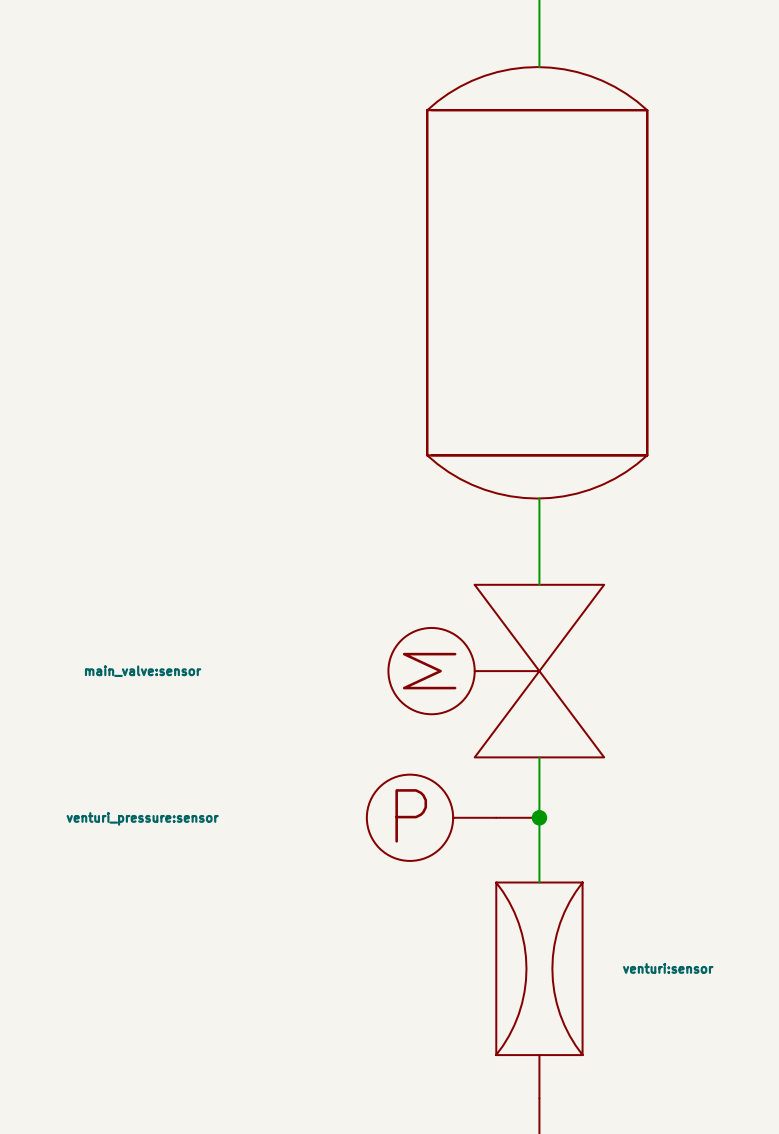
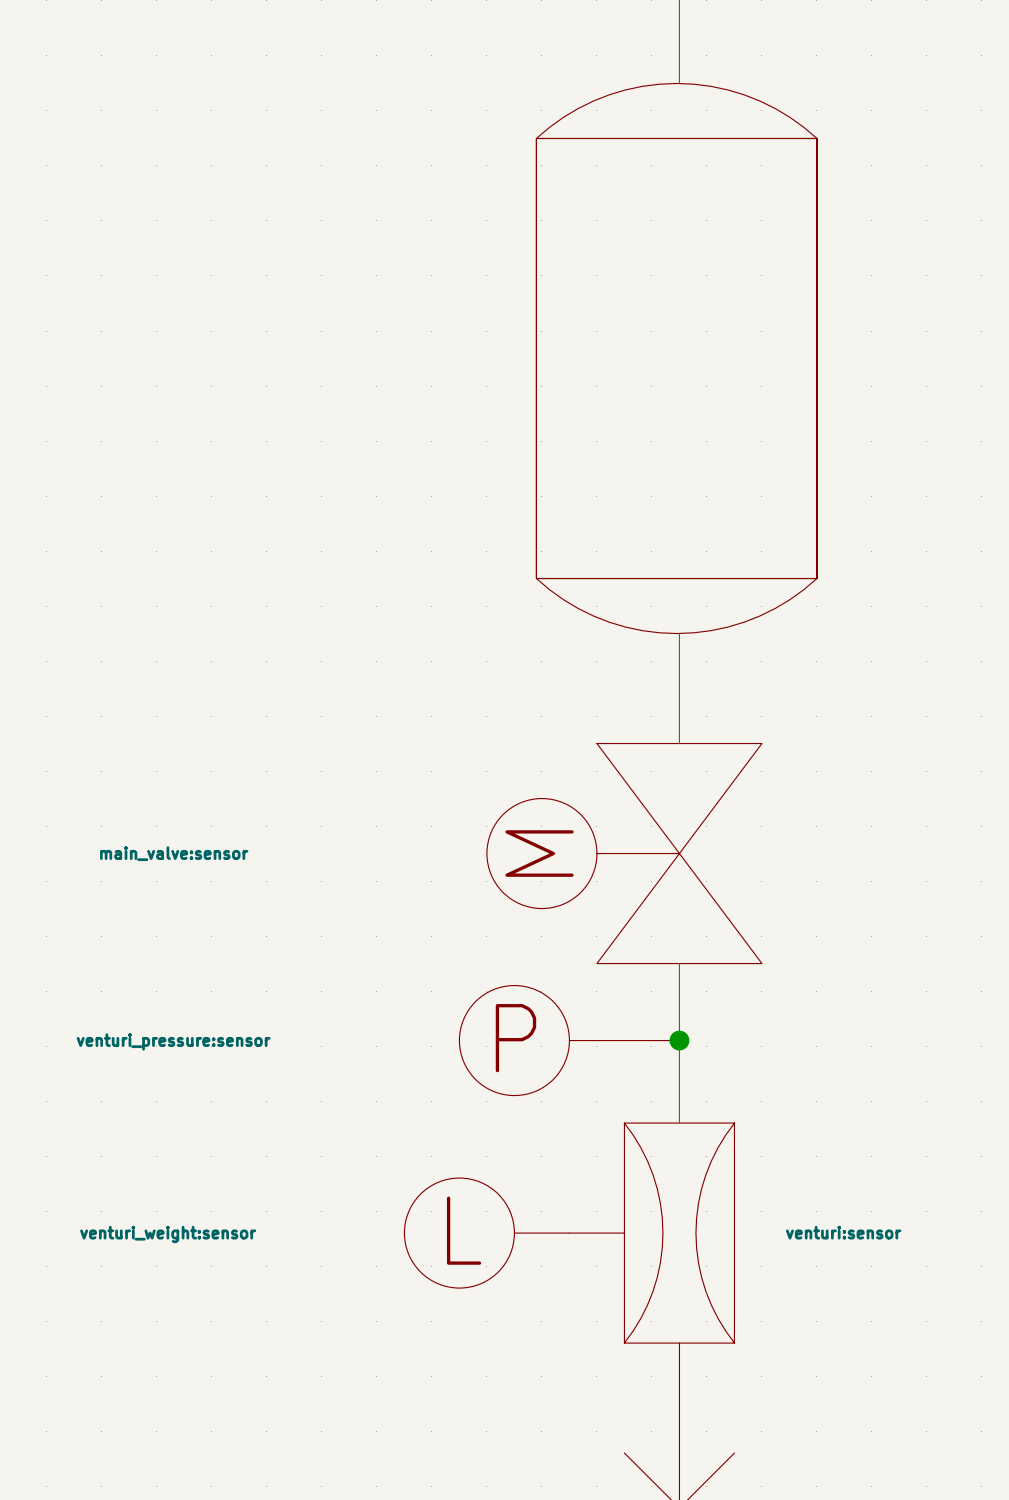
part: none -> venturi_weight:sensor (514, 1233)

